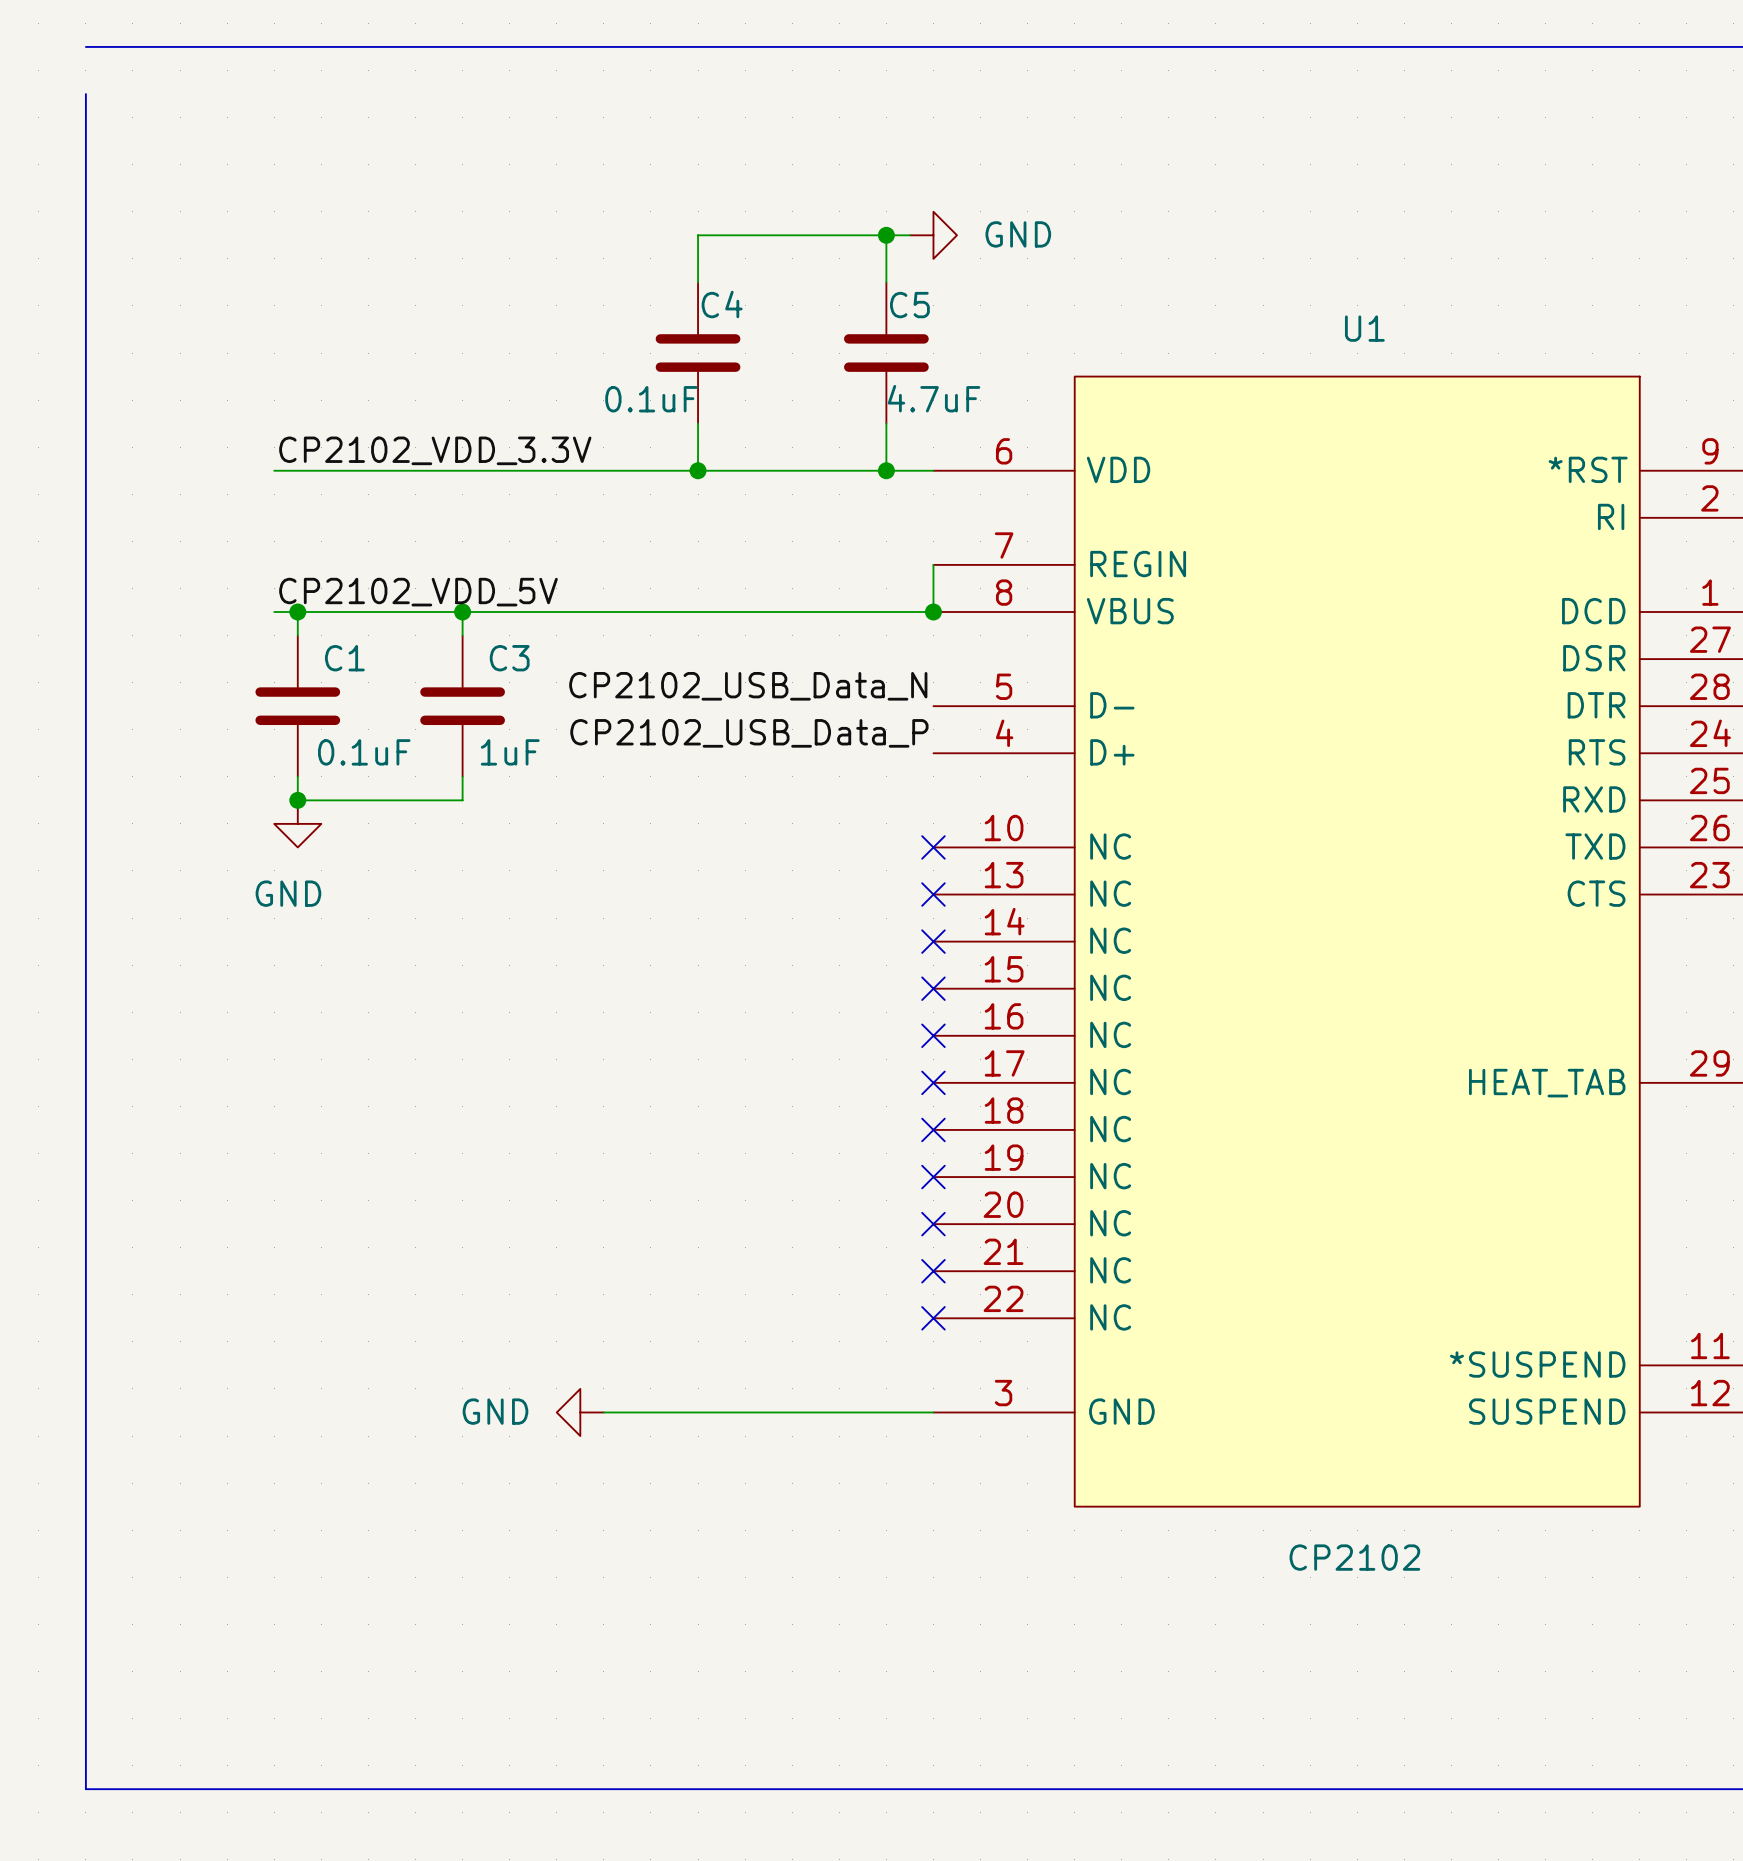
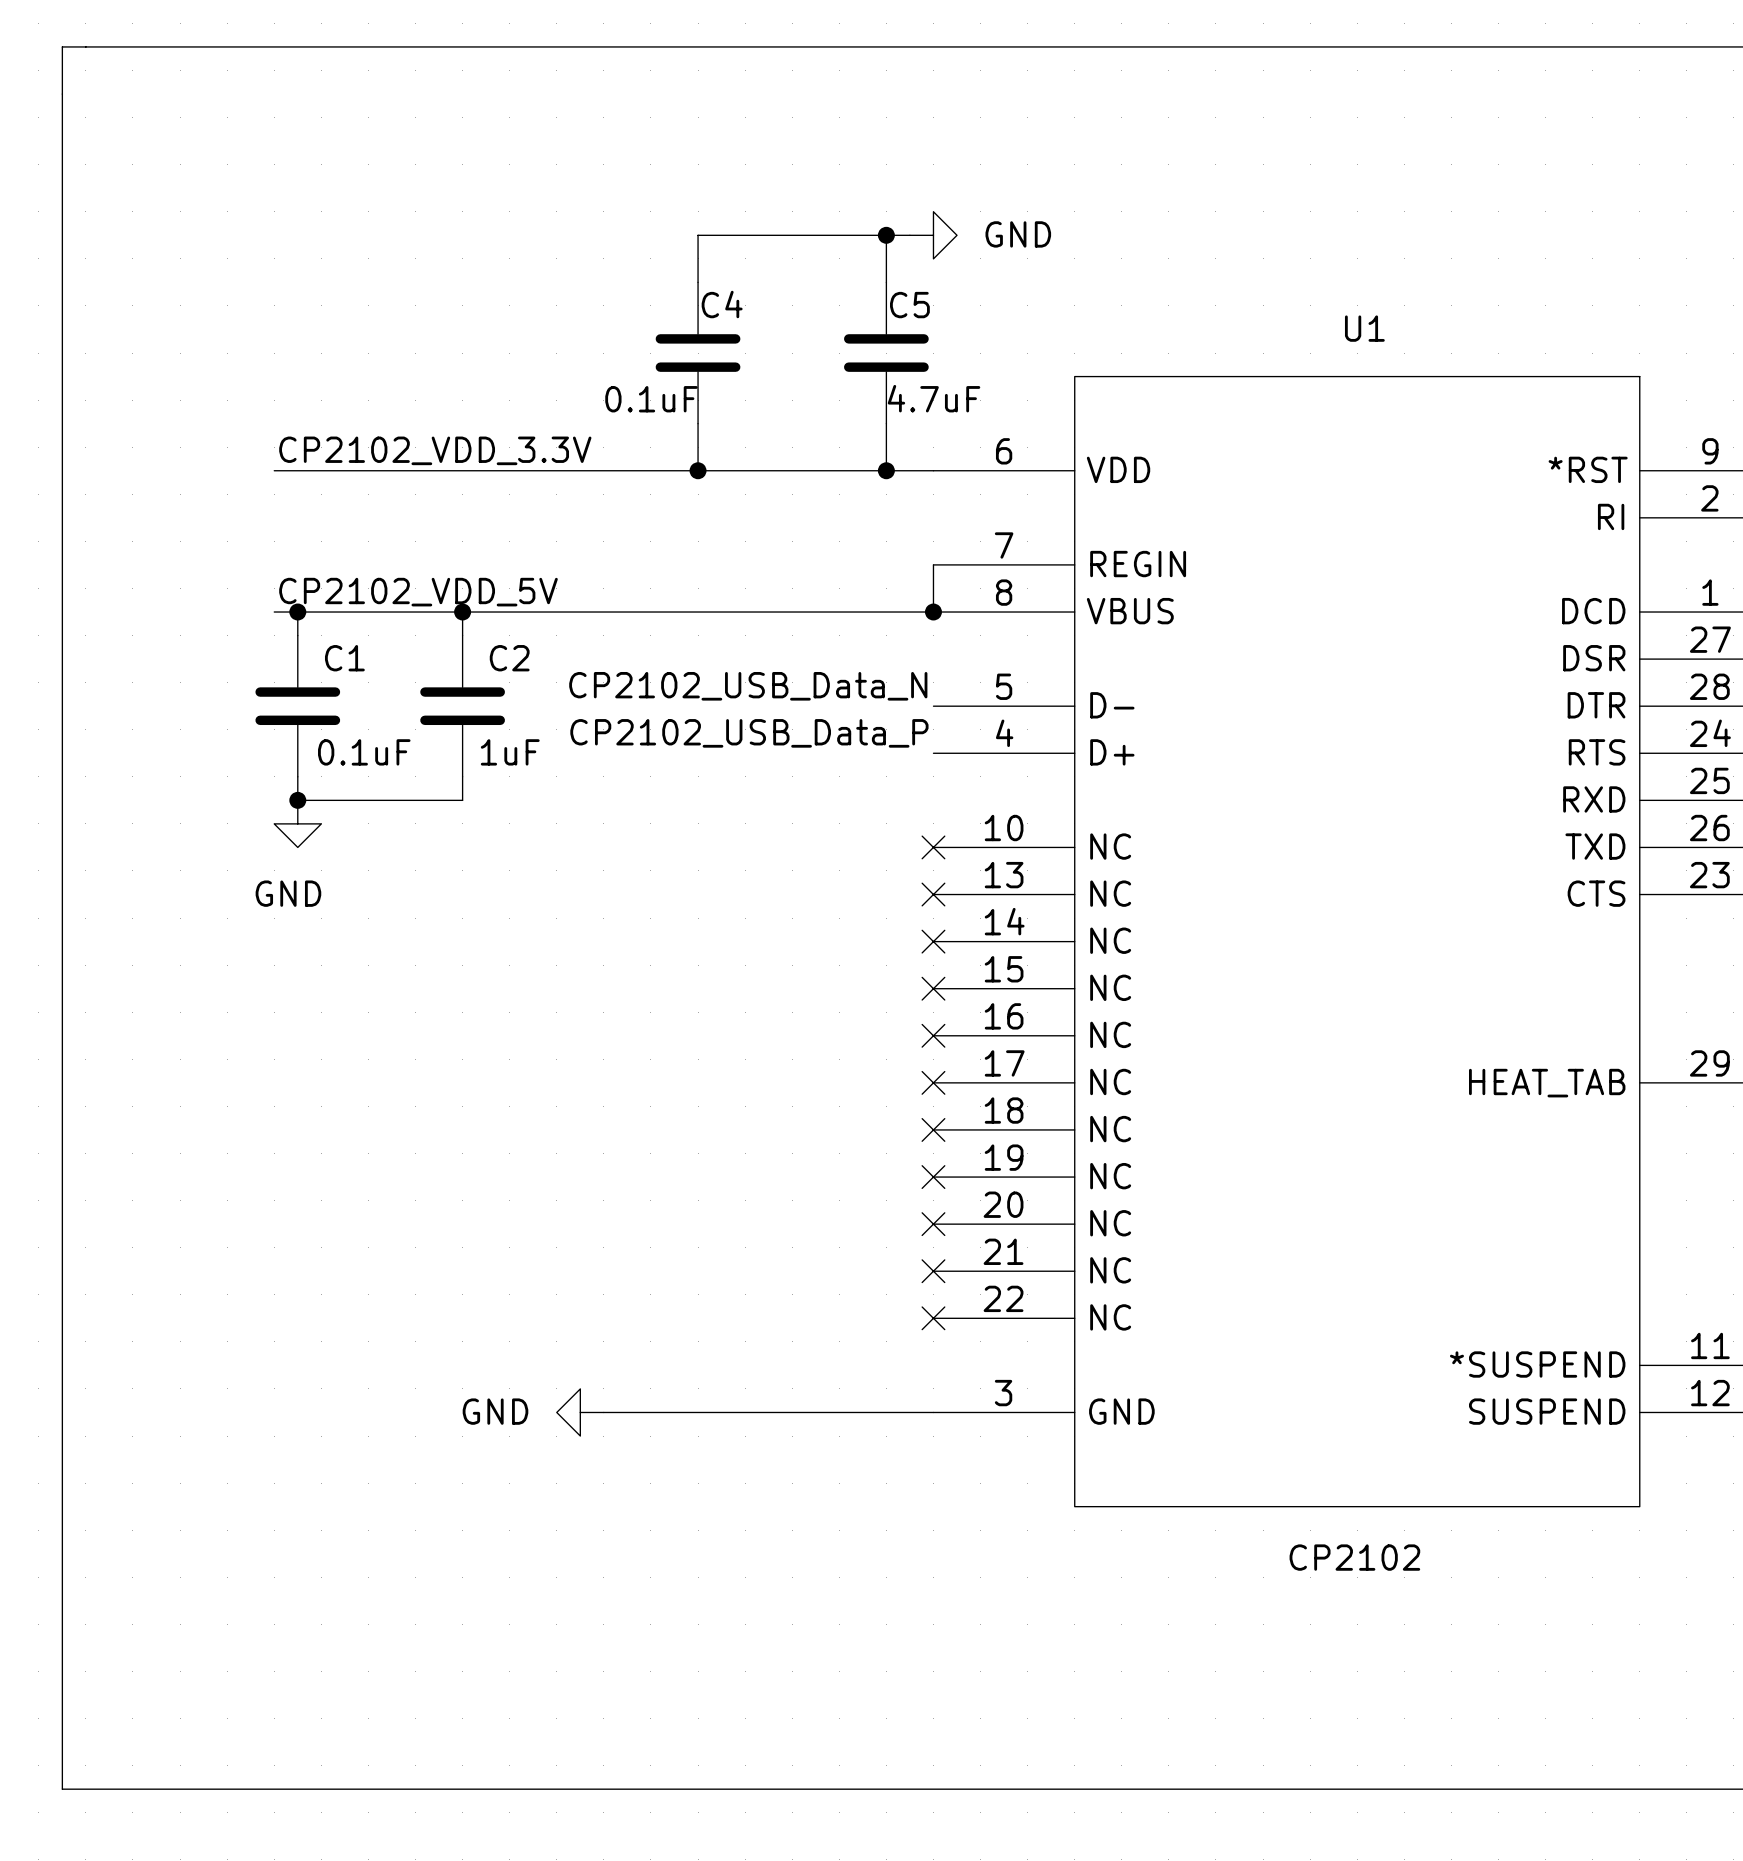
line: (85, 94) (85, 1789) -> (85, 46) (62, 46) (62, 1789) (85, 1789)
C3 name: C3 (509, 658) -> C2 (509, 658)

